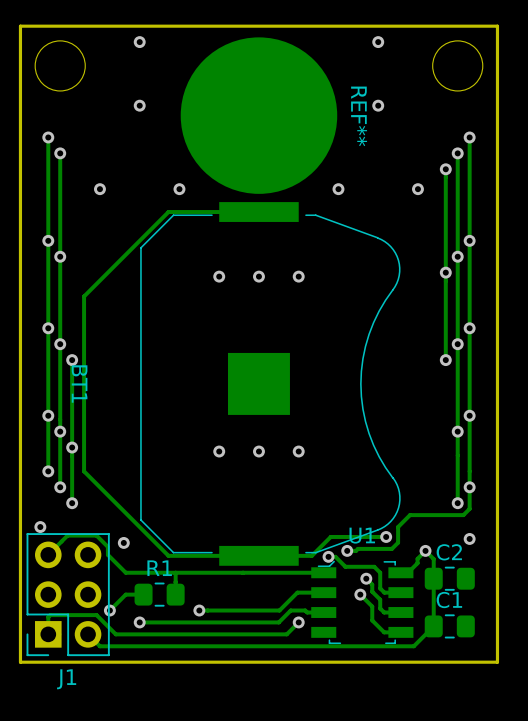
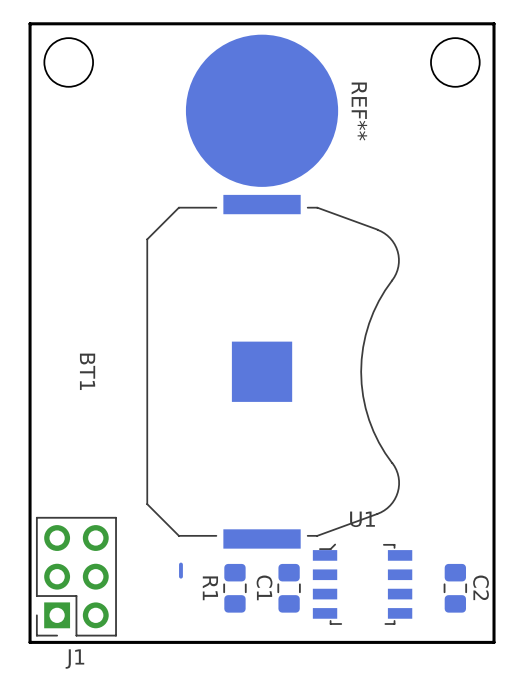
via: (139, 42) -> none
via: (378, 42) -> none
via: (139, 105) -> none
via: (378, 105) -> none
track: (48, 137) (48, 471) -> none
via: (48, 137) -> none
track: (469, 137) (469, 508) (463, 515) (410, 515) (398, 527) (398, 542) (391, 548) (358, 548) (356, 550) (347, 550) -> none
via: (469, 137) -> none
track: (60, 153) (60, 487) -> none
via: (60, 153) -> none
track: (457, 153) (457, 503) -> none
via: (457, 153) -> none
track: (445, 169) (445, 360) -> none
via: (445, 169) -> none
via: (99, 189) -> none
via: (179, 189) -> none
via: (338, 189) -> none
via: (417, 189) -> none
track: (258, 212) (168, 212) (84, 296) (84, 471) (168, 555) (311, 555) (330, 536) (386, 536) -> none
via: (48, 240) -> none
via: (469, 240) -> none
via: (60, 256) -> none
via: (457, 256) -> none
via: (445, 272) -> none
via: (219, 276) -> none
via: (258, 276) -> none
via: (298, 276) -> none
via: (48, 328) -> none
via: (469, 328) -> none
via: (60, 344) -> none
via: (457, 344) -> none
track: (72, 360) (72, 503) -> none
via: (72, 360) -> none
via: (445, 360) -> none
via: (48, 415) -> none
via: (469, 415) -> none
via: (60, 431) -> none
via: (457, 431) -> none
via: (72, 447) -> none
via: (219, 451) -> none
via: (258, 451) -> none
via: (298, 451) -> none
via: (48, 471) -> none
via: (60, 487) -> none
via: (469, 487) -> none
via: (72, 503) -> none
via: (457, 503) -> none
via: (40, 527) -> none
via: (386, 536) -> none
via: (469, 538) -> none
via: (123, 542) -> none
via: (347, 550) -> none
via: (425, 550) -> none
track: (48, 554) (67, 535) (96, 535) (107, 546) (107, 554) (125, 572) (323, 572) -> none
track: (328, 556) (335, 556) (345, 566) (374, 566) (380, 572) (380, 588) (384, 592) (400, 592) -> none
via: (328, 556) -> none
R1 name position: R1 (159, 568) -> R1 (210, 588)
track: (175, 572) (175, 582) -> none
track: (400, 572) (408, 572) (425, 550) (433, 559) (433, 626) (413, 646) (99, 646) (88, 634) -> none
track: (366, 578) (372, 584) (372, 591) (380, 599) (380, 608) (384, 612) (400, 612) -> none
via: (366, 578) -> none
C2 rotation: 0° (449, 578) -> 90° clockwise (455, 588)
track: (323, 592) (297, 592) (279, 610) (199, 610) -> none
track: (143, 594) (125, 594) (109, 610) -> none
R1 rotation: 0° (159, 594) -> 90° clockwise (234, 588)
R1 position: (159, 594) -> (234, 588)
track: (360, 594) (372, 606) (372, 620) (384, 632) (400, 632) -> none
via: (360, 594) -> none
C1 name position: C1 (449, 600) -> C1 (264, 587)
via: (109, 610) -> none
via: (199, 610) -> none
track: (323, 612) (290, 610) (278, 622) (139, 622) -> none
via: (139, 622) -> none
track: (298, 622) (286, 634) (115, 634) (96, 615) (50, 615) (48, 617) (48, 634) (59, 634) -> none
via: (298, 622) -> none
C1 rotation: 0° (449, 626) -> 90° clockwise (289, 588)
C1 position: (449, 626) -> (289, 588)

